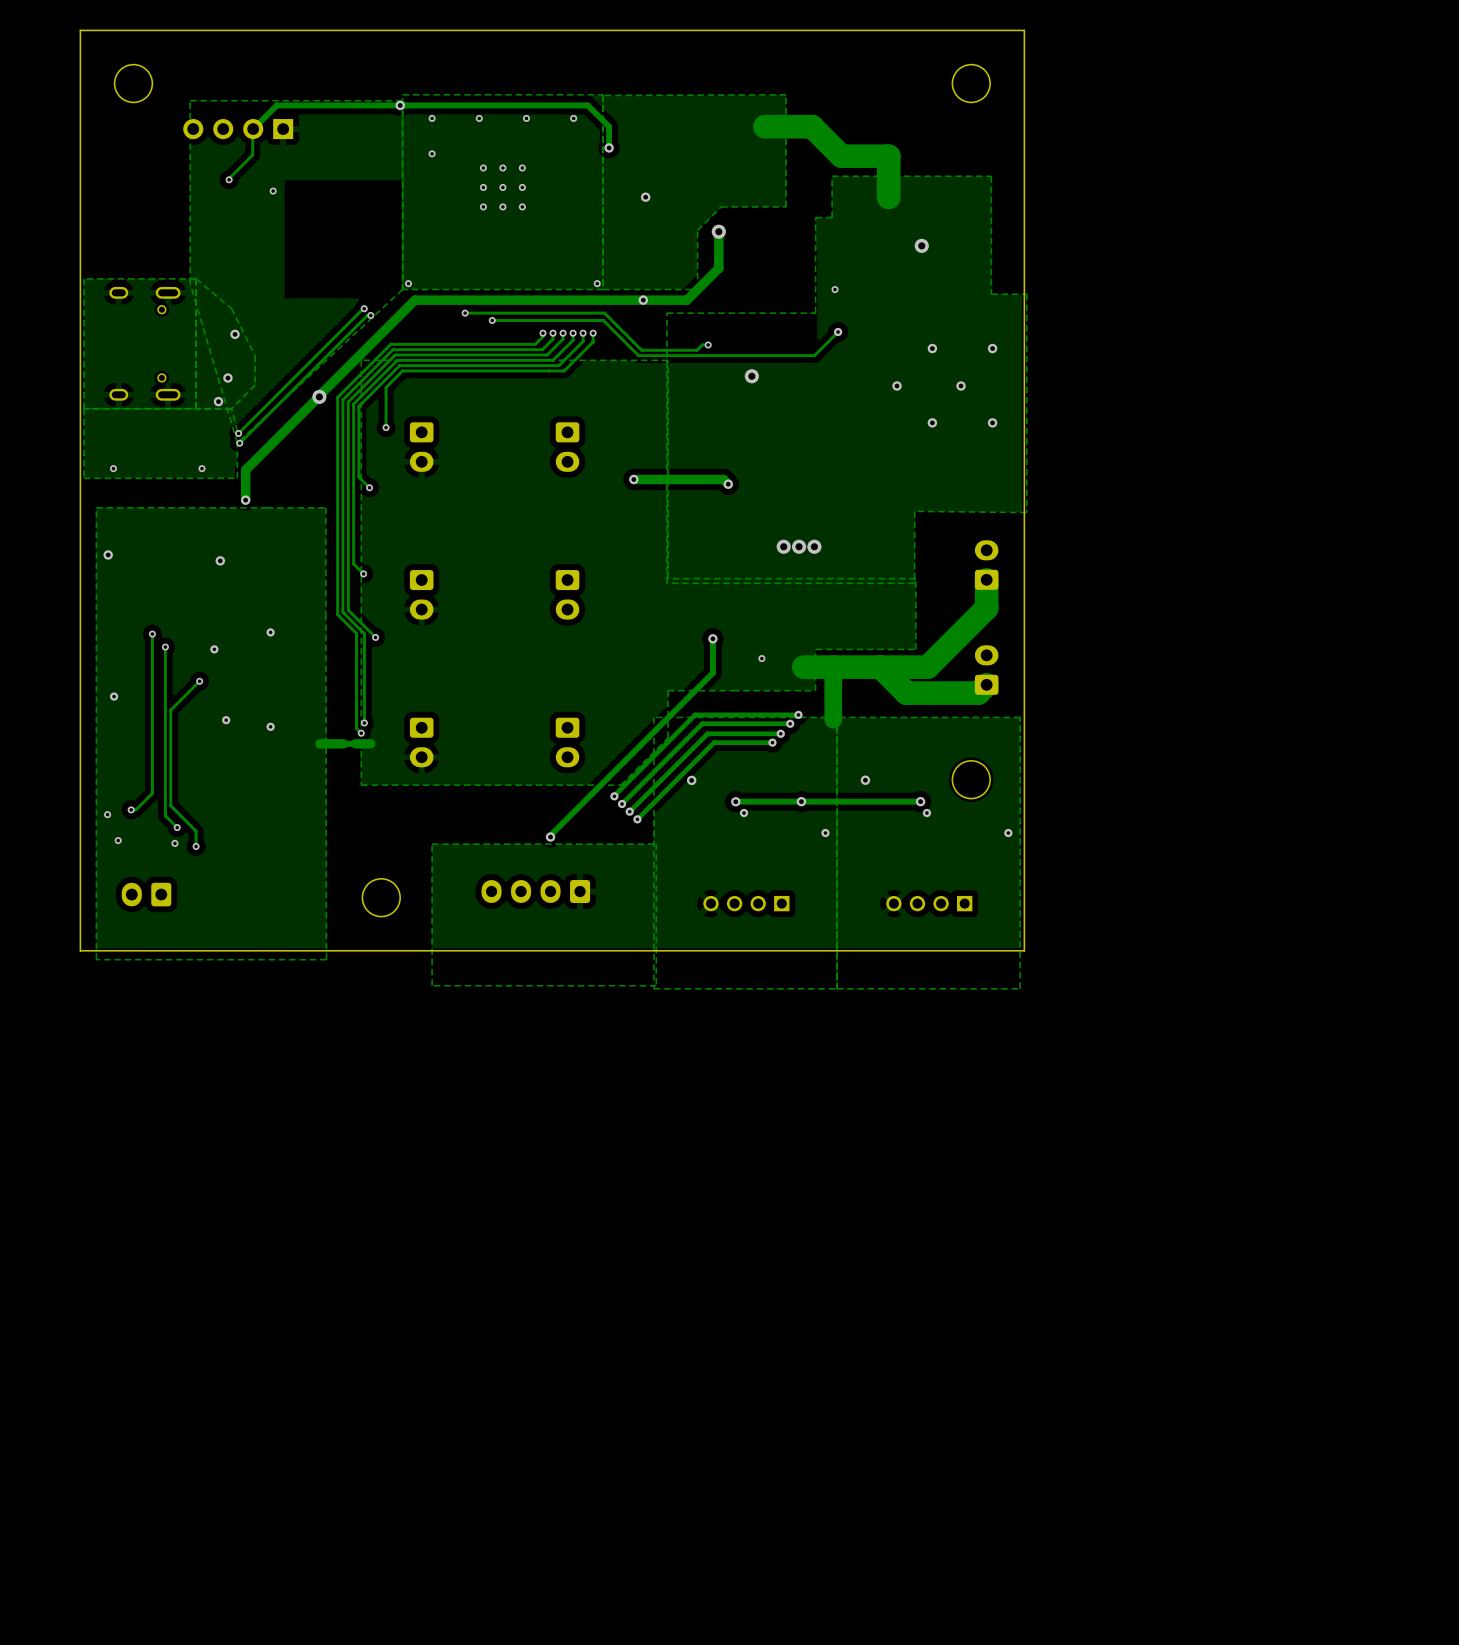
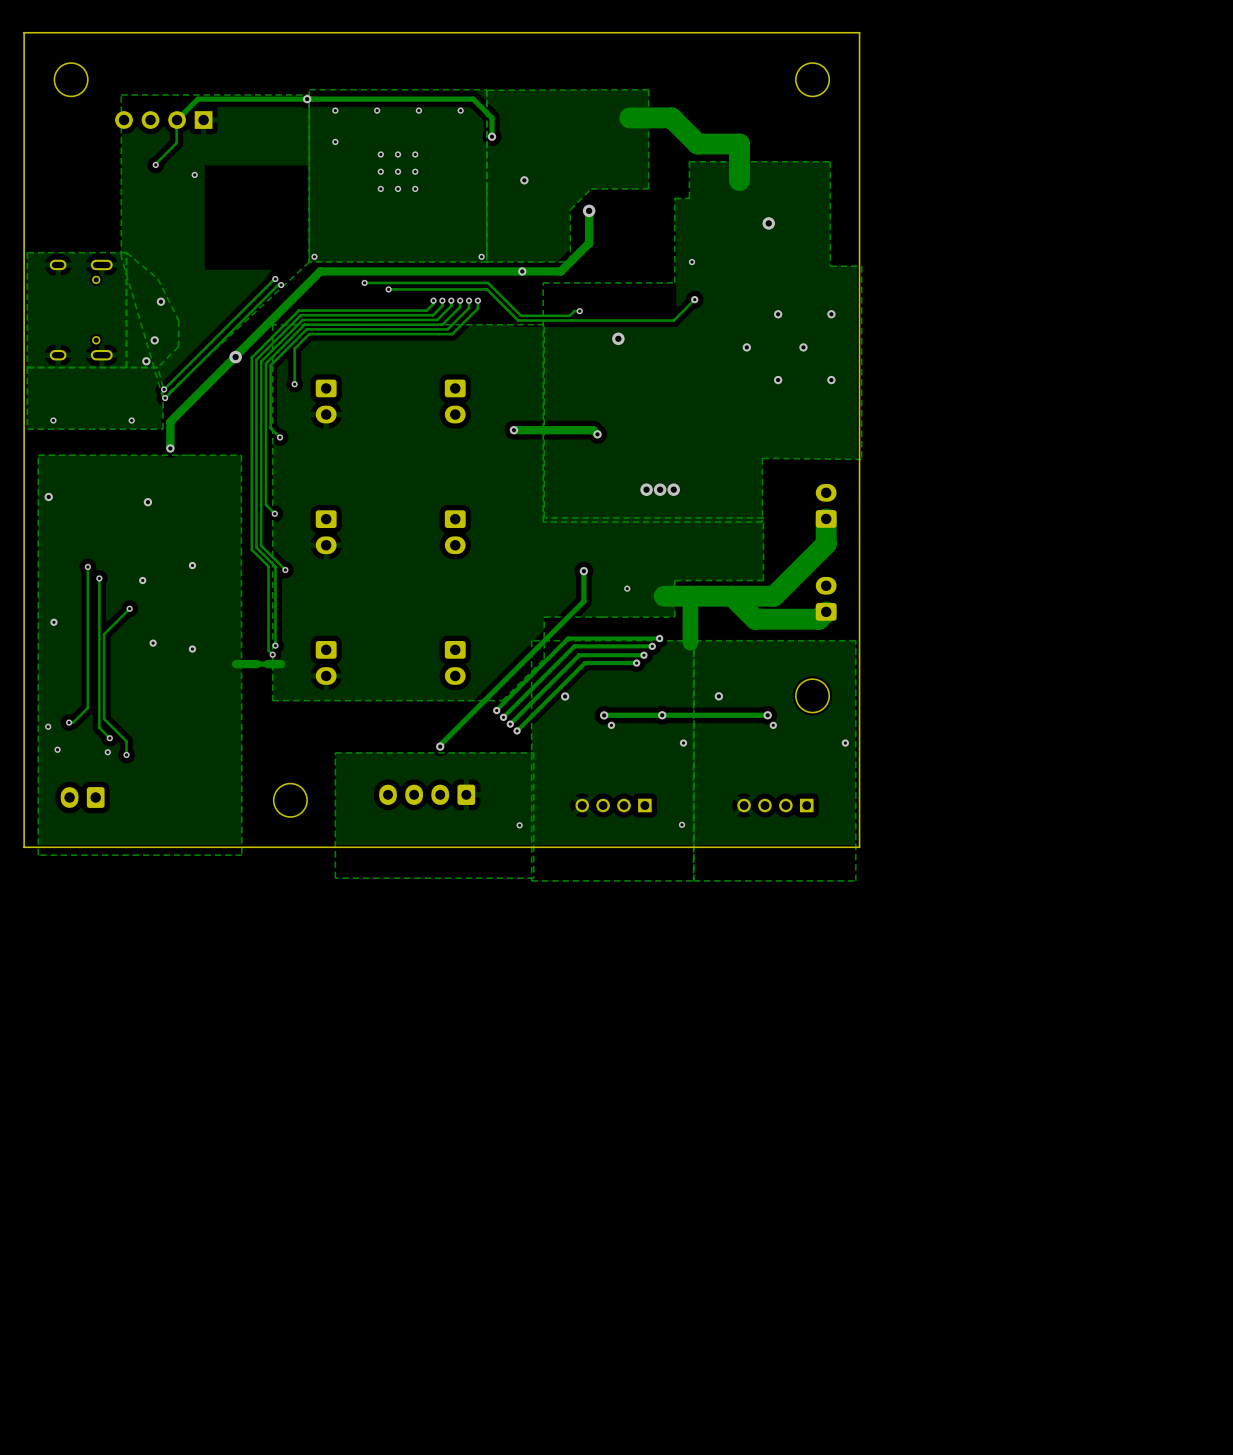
via: none -> (682, 824)
via: none -> (519, 825)

